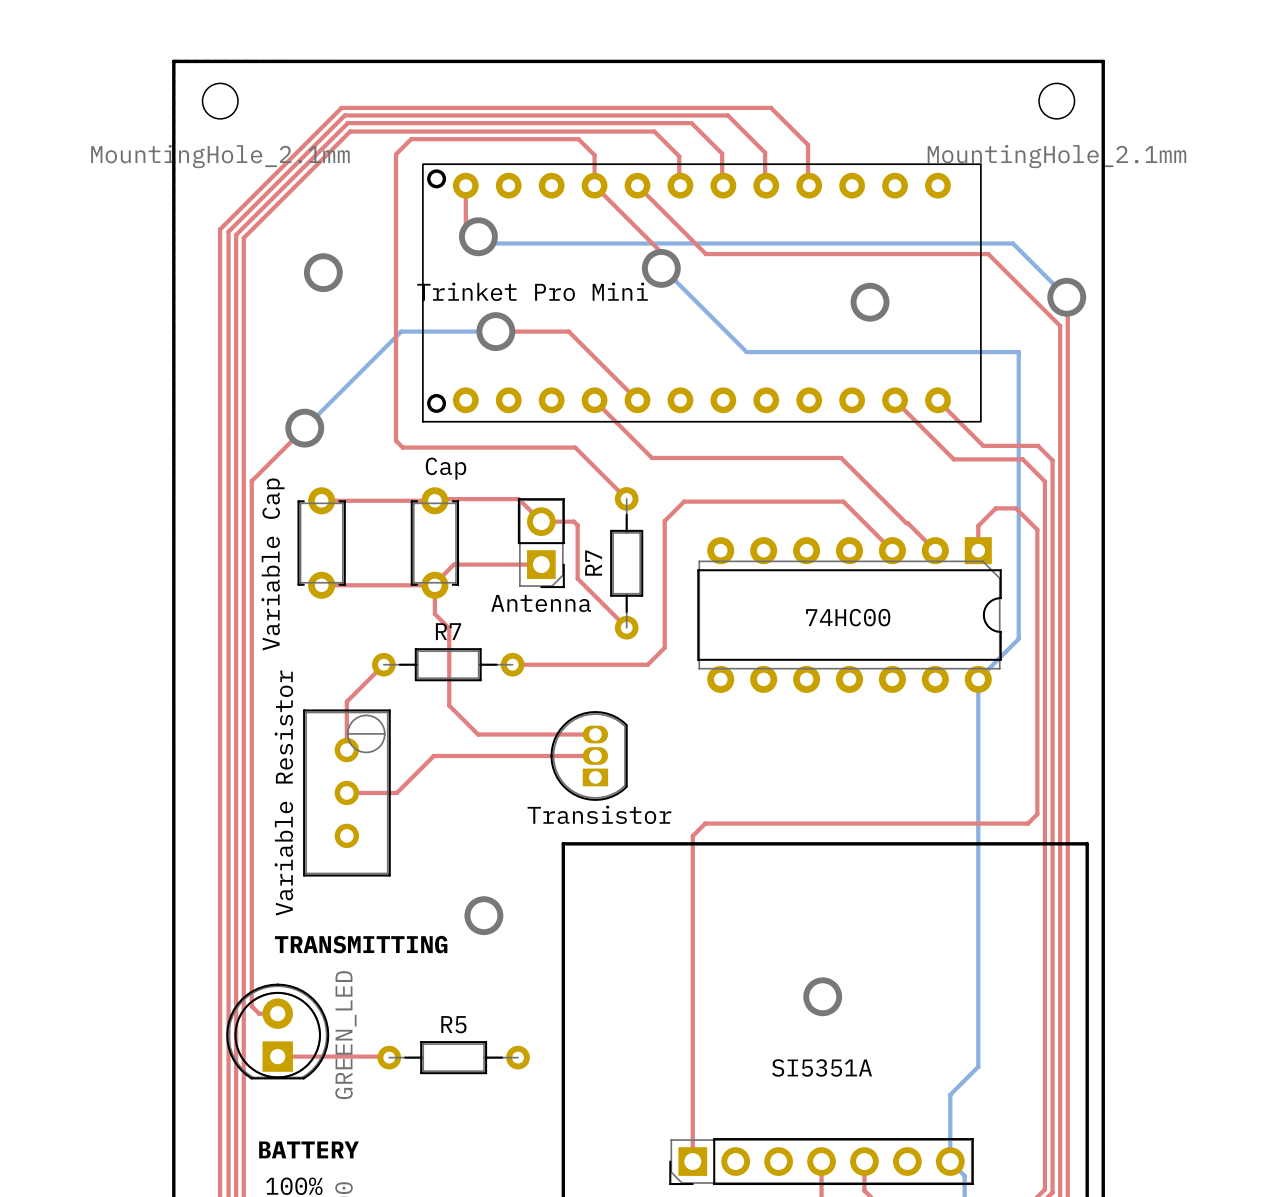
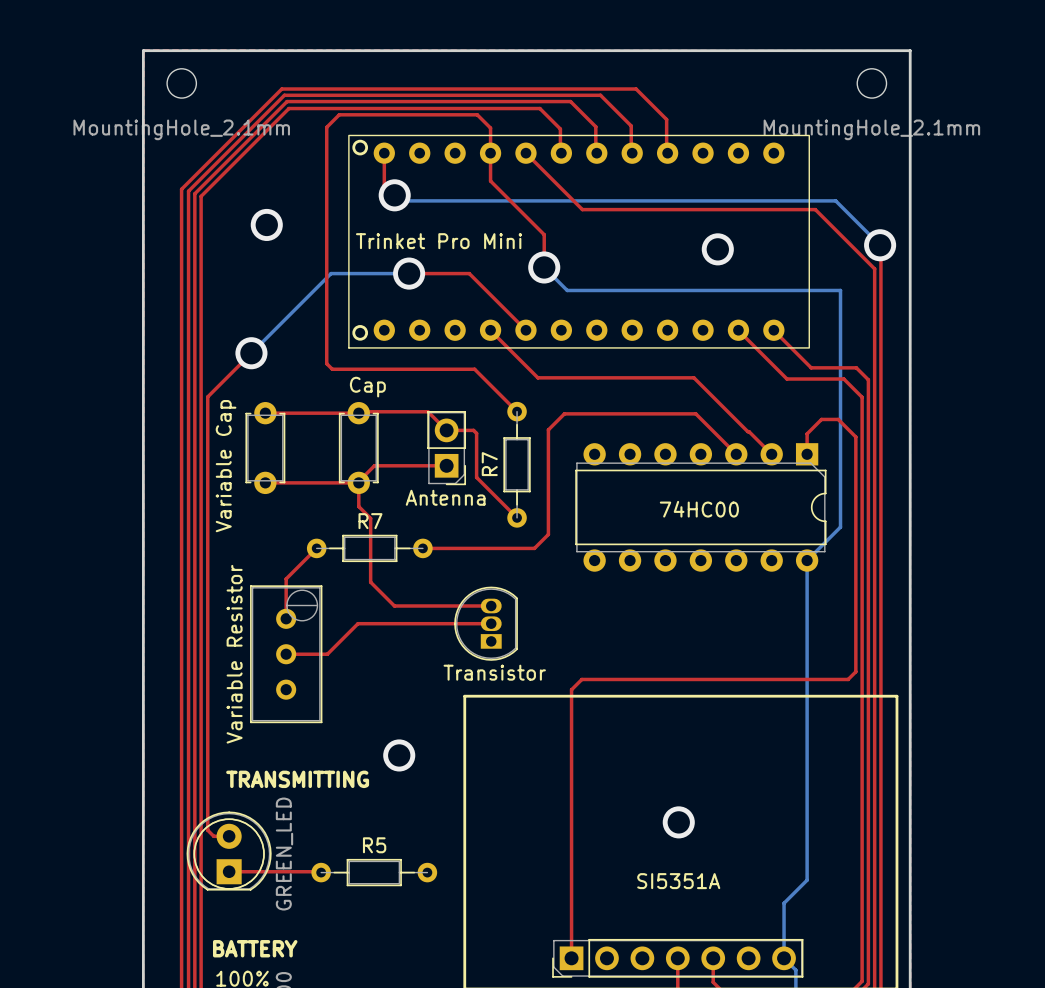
top track: (594, 185) (661, 252) (661, 268) -> (490, 153) (490, 181) (544, 234) (544, 267)
bottom track: (661, 268) (746, 352) -> (544, 267) (567, 290) (616, 290)
via position: (661, 268) -> (544, 267)

